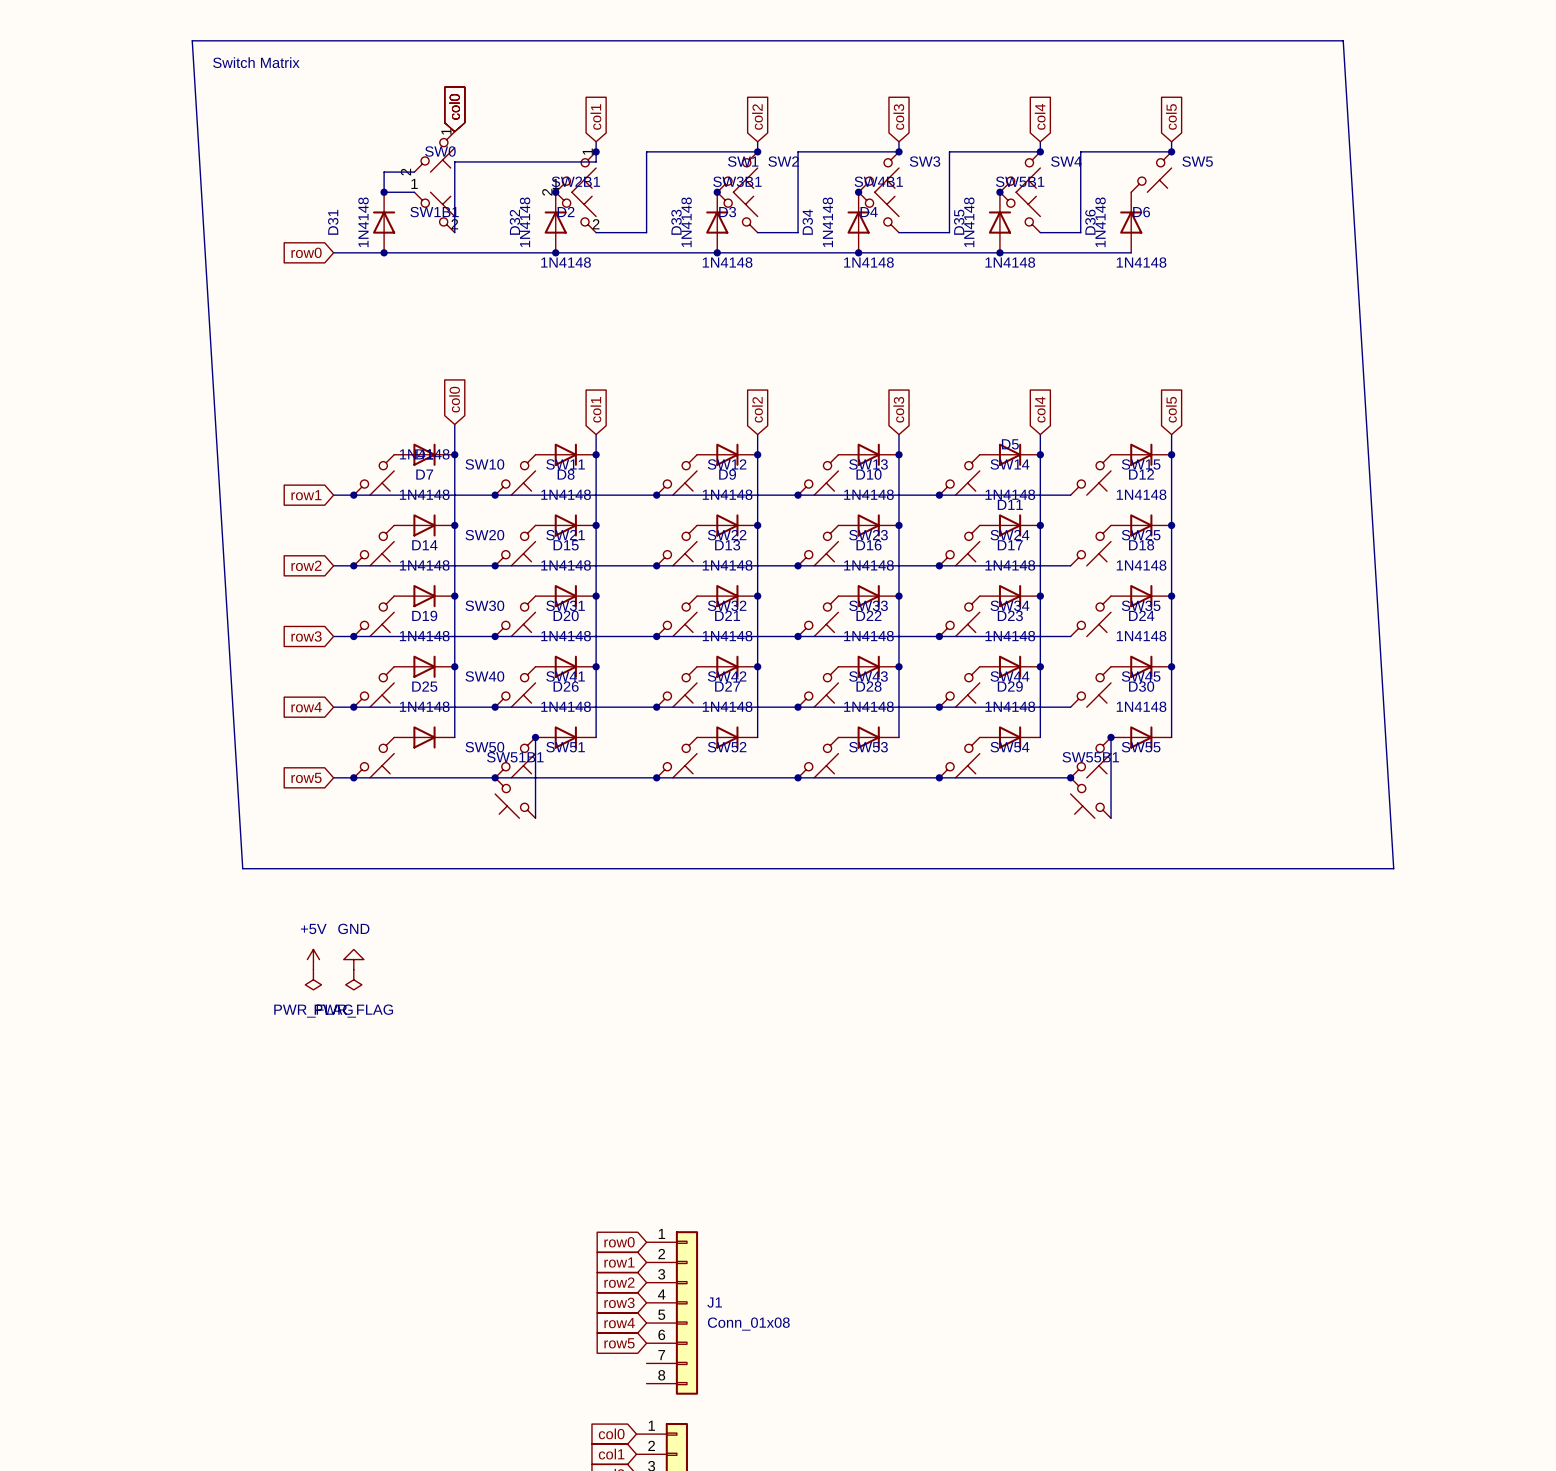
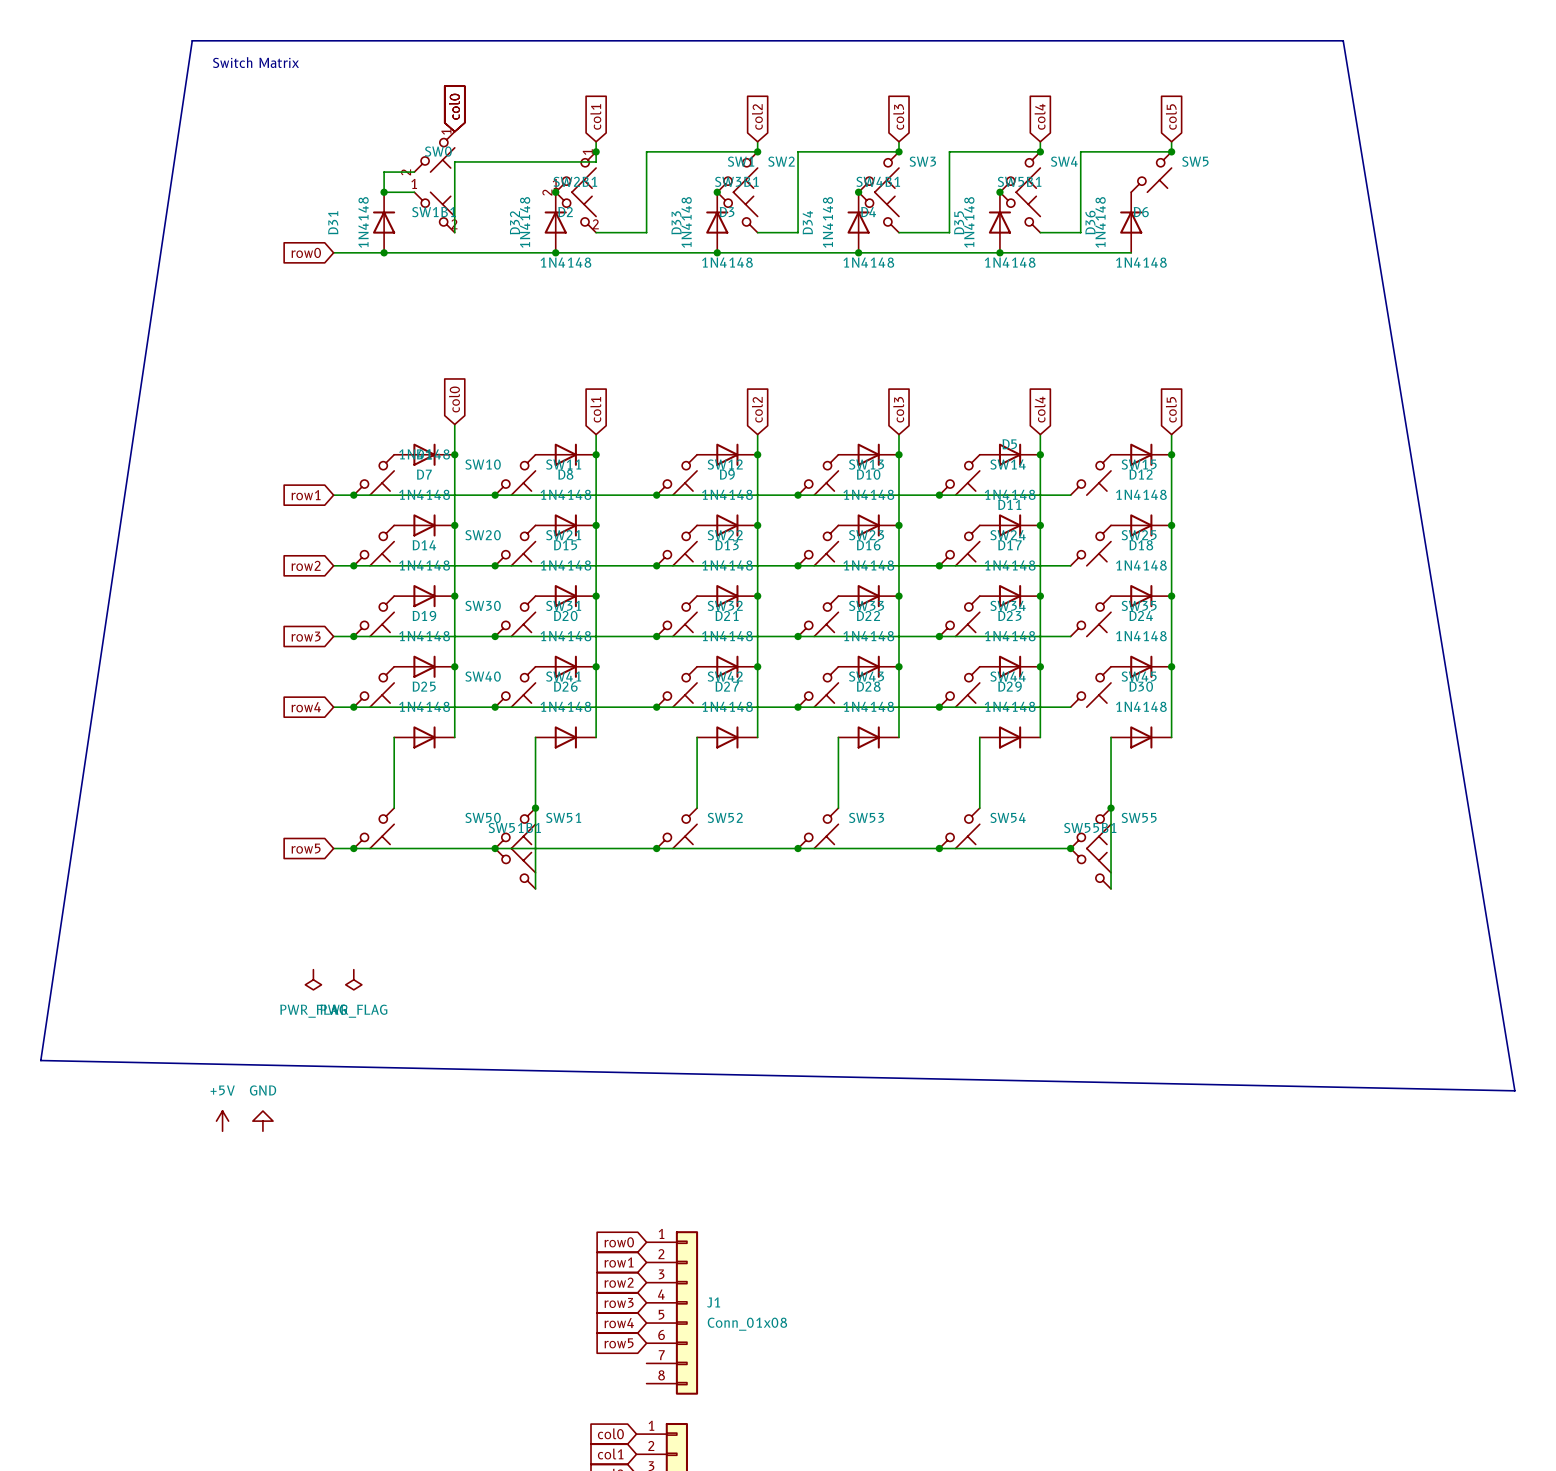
line: (192, 40) (242, 868) (1393, 868) (1343, 40) -> (192, 40) (40, 1060) (1514, 1090) (1343, 40)
wire: none -> (394, 737) (394, 808)
junction: (535, 737) -> none
wire: none -> (697, 737) (697, 808)
wire: none -> (838, 737) (838, 808)
wire: none -> (979, 737) (979, 808)
junction: (1111, 737) -> none
SW50 position: (373, 757) -> (373, 828)
SW51 position: (515, 757) -> (515, 828)
SW52 position: (676, 757) -> (676, 828)
SW53 position: (818, 757) -> (818, 828)
SW54 position: (959, 757) -> (959, 828)
SW55 position: (1090, 757) -> (1090, 828)
global label position: row5 (306, 777) -> row5 (306, 848)
wire: (333, 777) (1070, 777) -> (333, 848) (1070, 848)
junction: (353, 777) -> none
junction: (495, 777) -> none
junction: (656, 777) -> none
junction: (798, 777) -> none
junction: (939, 777) -> none
junction: (1070, 777) -> none
SW51B1 rotation: 0° (515, 798) -> 180° (515, 868)
SW51B1 position: (515, 798) -> (515, 868)
SW55B1 rotation: 0° (1090, 798) -> 180° (1090, 868)
SW55B1 position: (1090, 798) -> (1090, 868)
junction: none -> (535, 808)
junction: none -> (1111, 808)
wire: none -> (535, 818) (535, 888)
wire: none -> (1111, 818) (1111, 888)
junction: none -> (353, 848)
junction: none -> (495, 848)
junction: none -> (656, 848)
junction: none -> (798, 848)
junction: none -> (939, 848)
junction: none -> (1070, 848)
power symbol position: +5V (313, 959) -> +5V (222, 1121)
power symbol position: GND (353, 959) -> GND (262, 1121)

